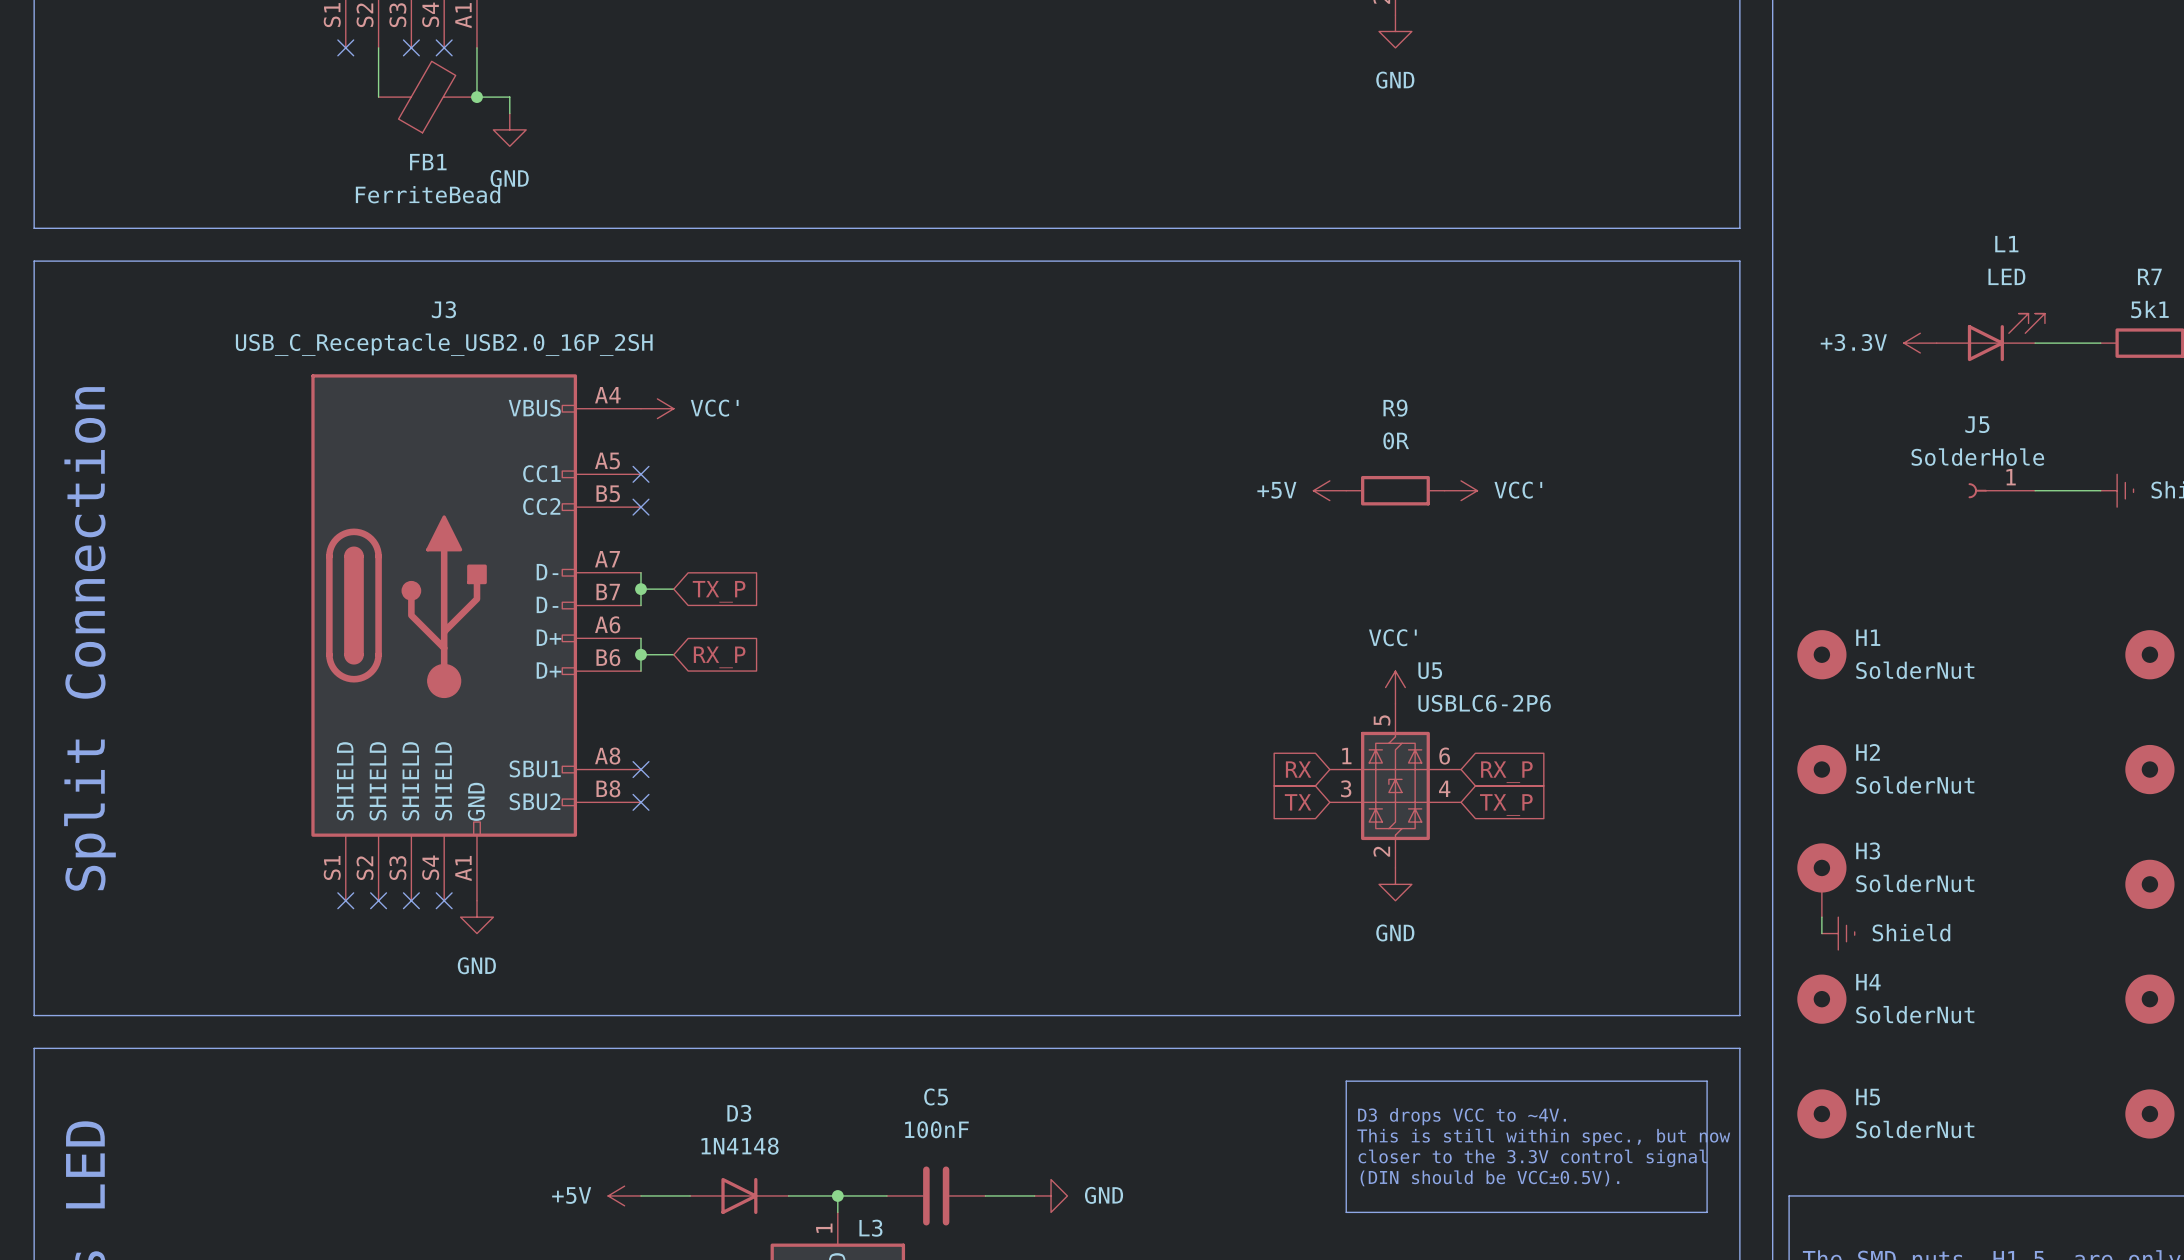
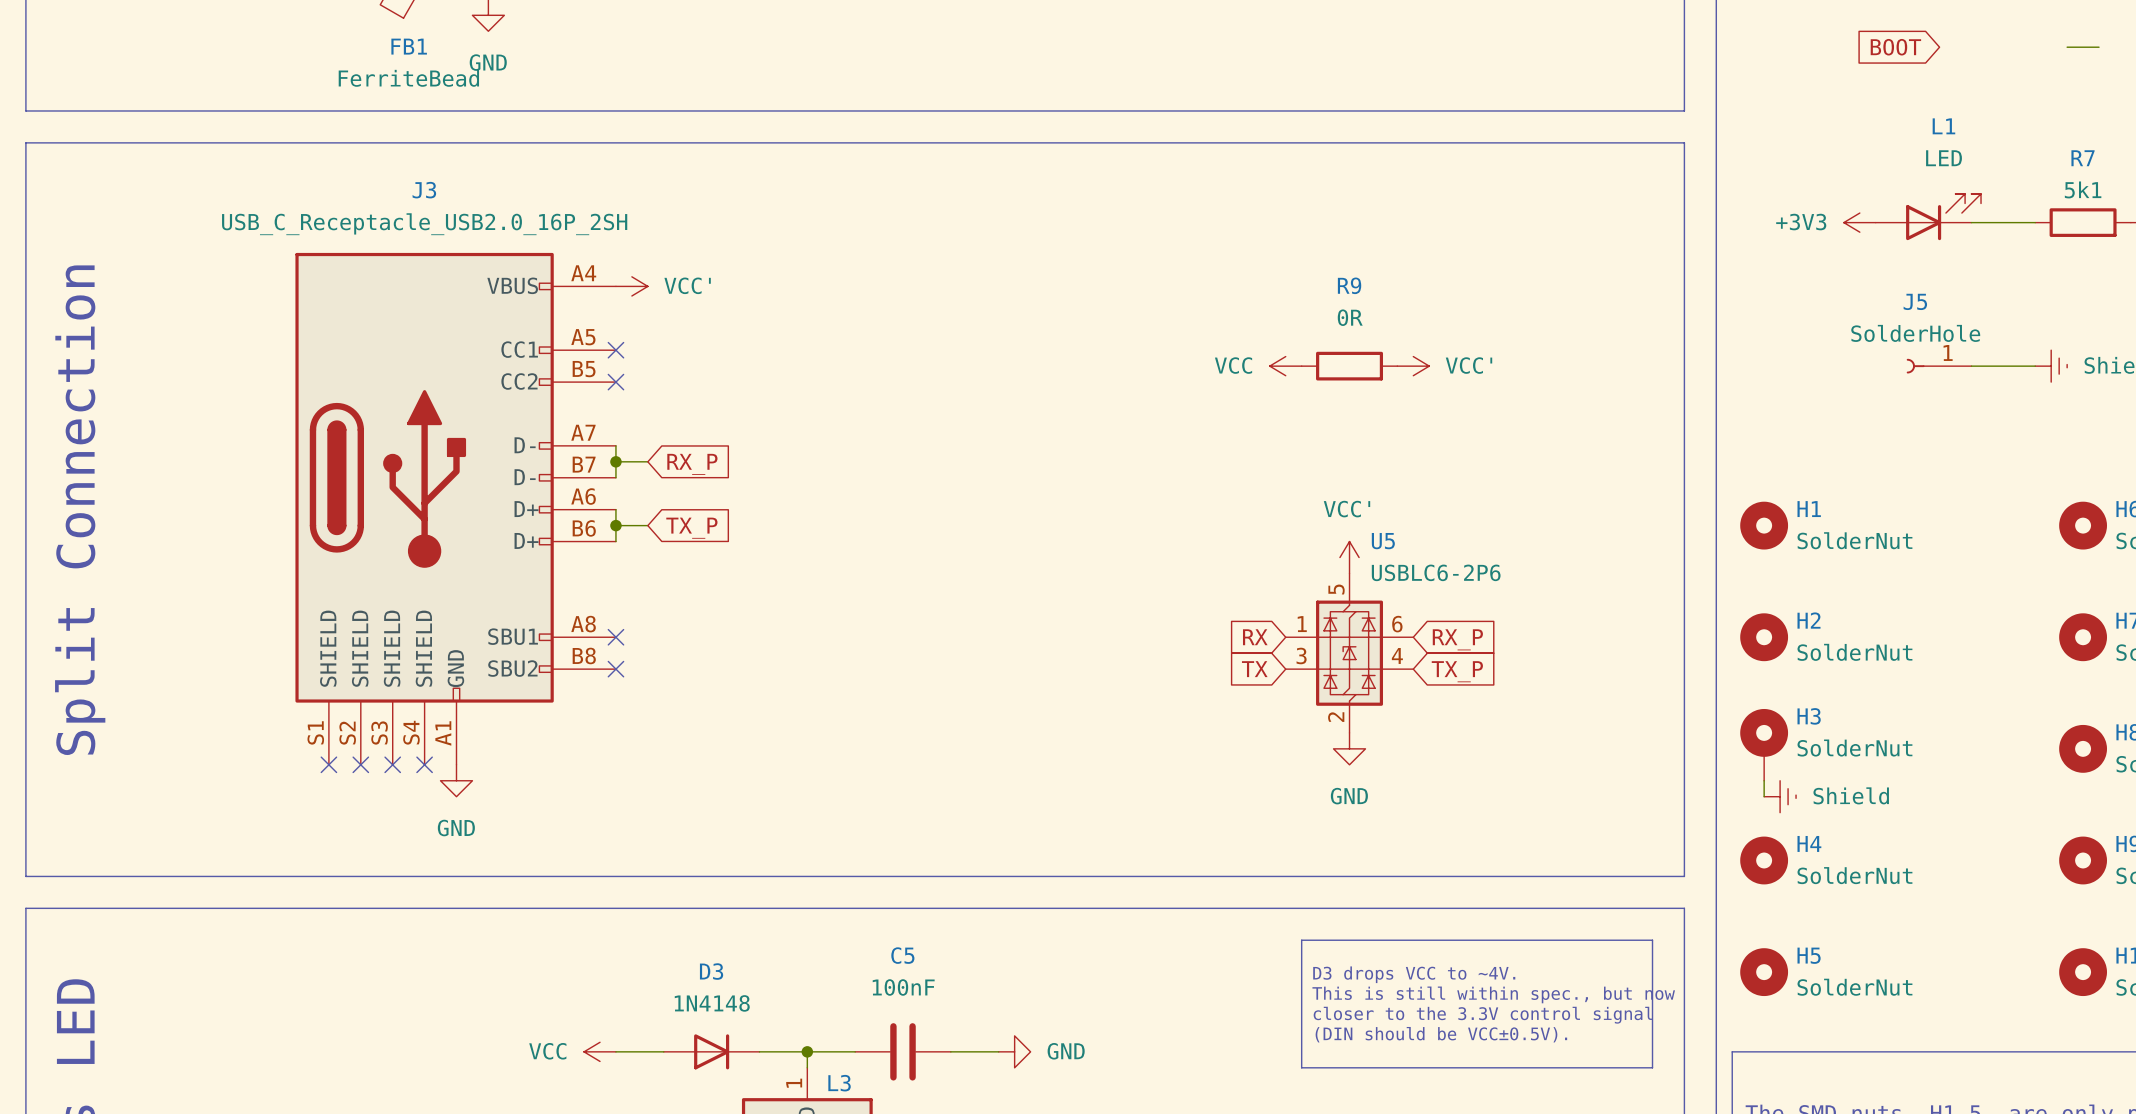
global label: none -> BOOT (1895, 47)
wire: none -> (2067, 47) (2099, 47)
power symbol: +3.3V (1920, 343) -> +3V3 (1859, 222)
power symbol: +5V (1329, 490) -> VCC (1285, 366)
global label: TX_P (719, 591) -> RX_P (692, 464)
global label: RX_P (719, 657) -> TX_P (691, 528)
power symbol: +5V (624, 1195) -> VCC (600, 1051)

